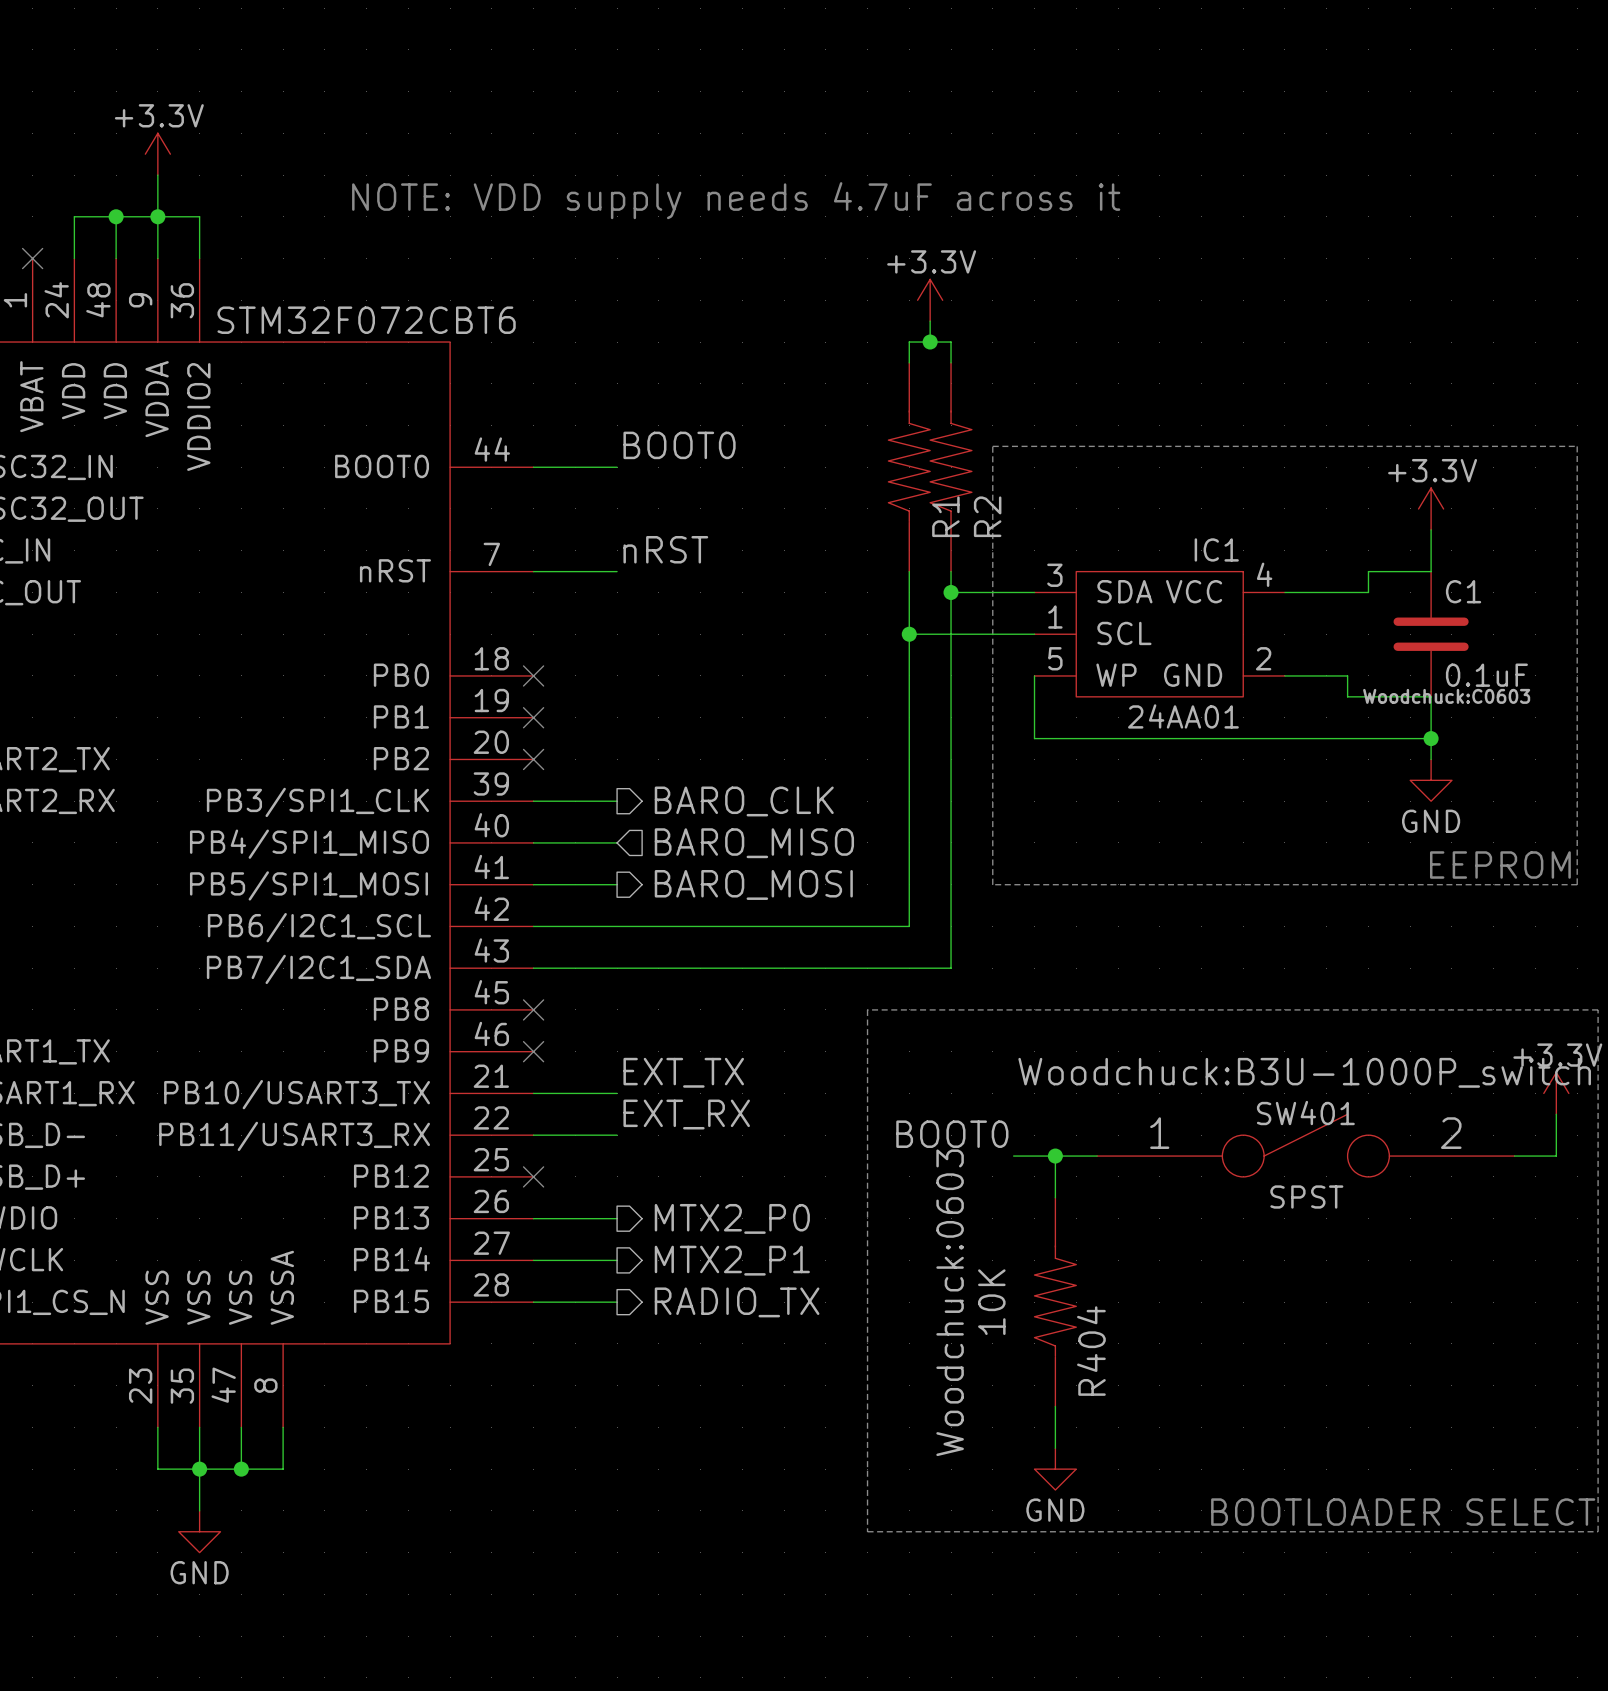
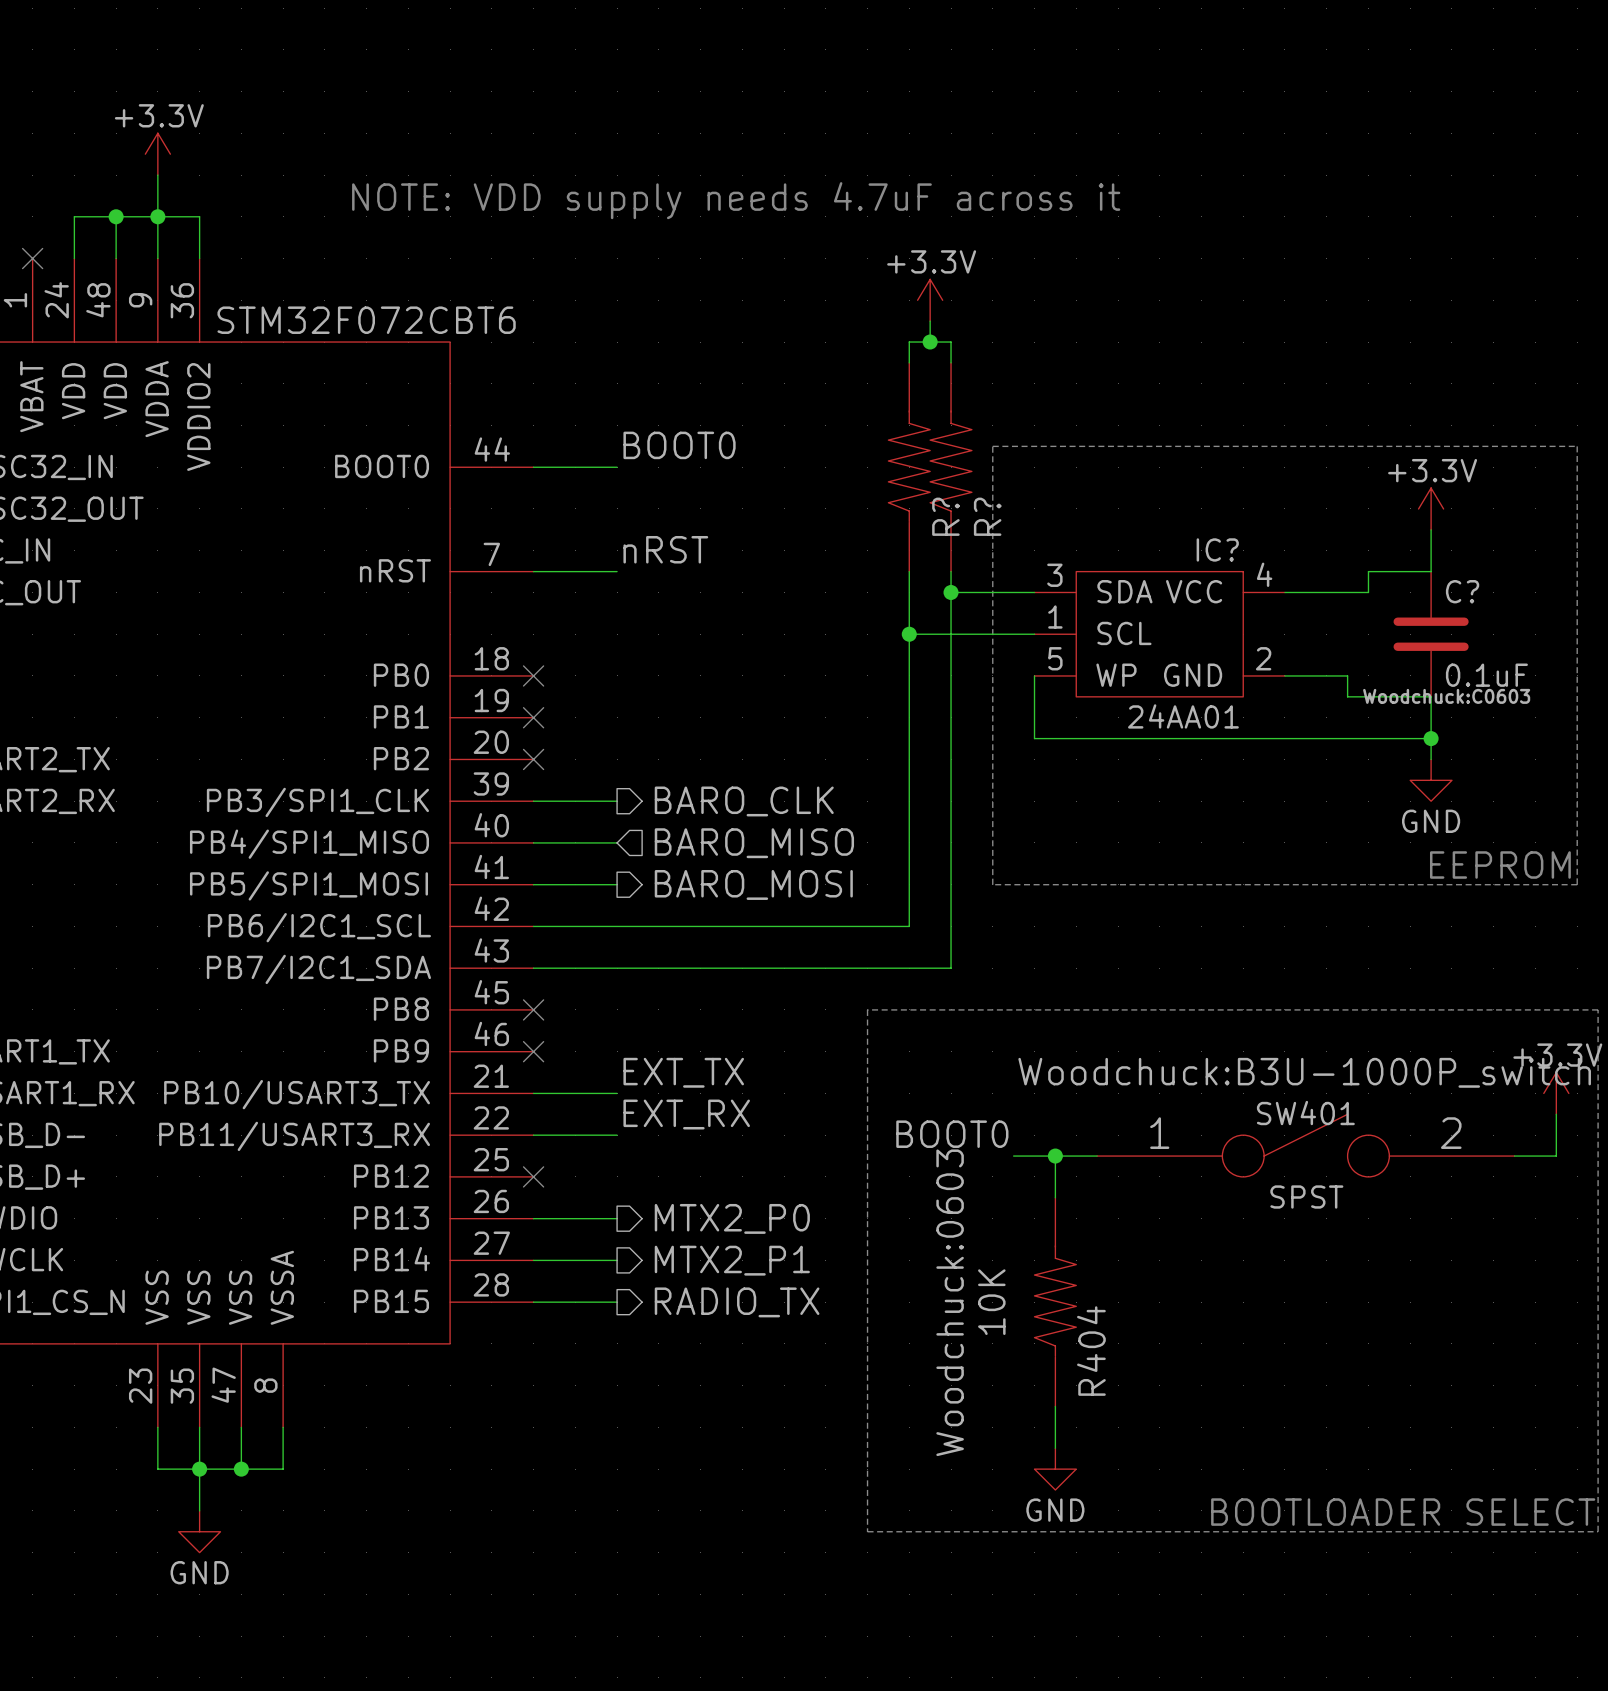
R1 name: R1 (945, 516) -> R? (945, 516)
R2 name: R2 (987, 516) -> R? (987, 516)
IC1 name: IC1 (1216, 549) -> IC? (1217, 549)
C1 name: C1 (1463, 591) -> C? (1462, 591)

